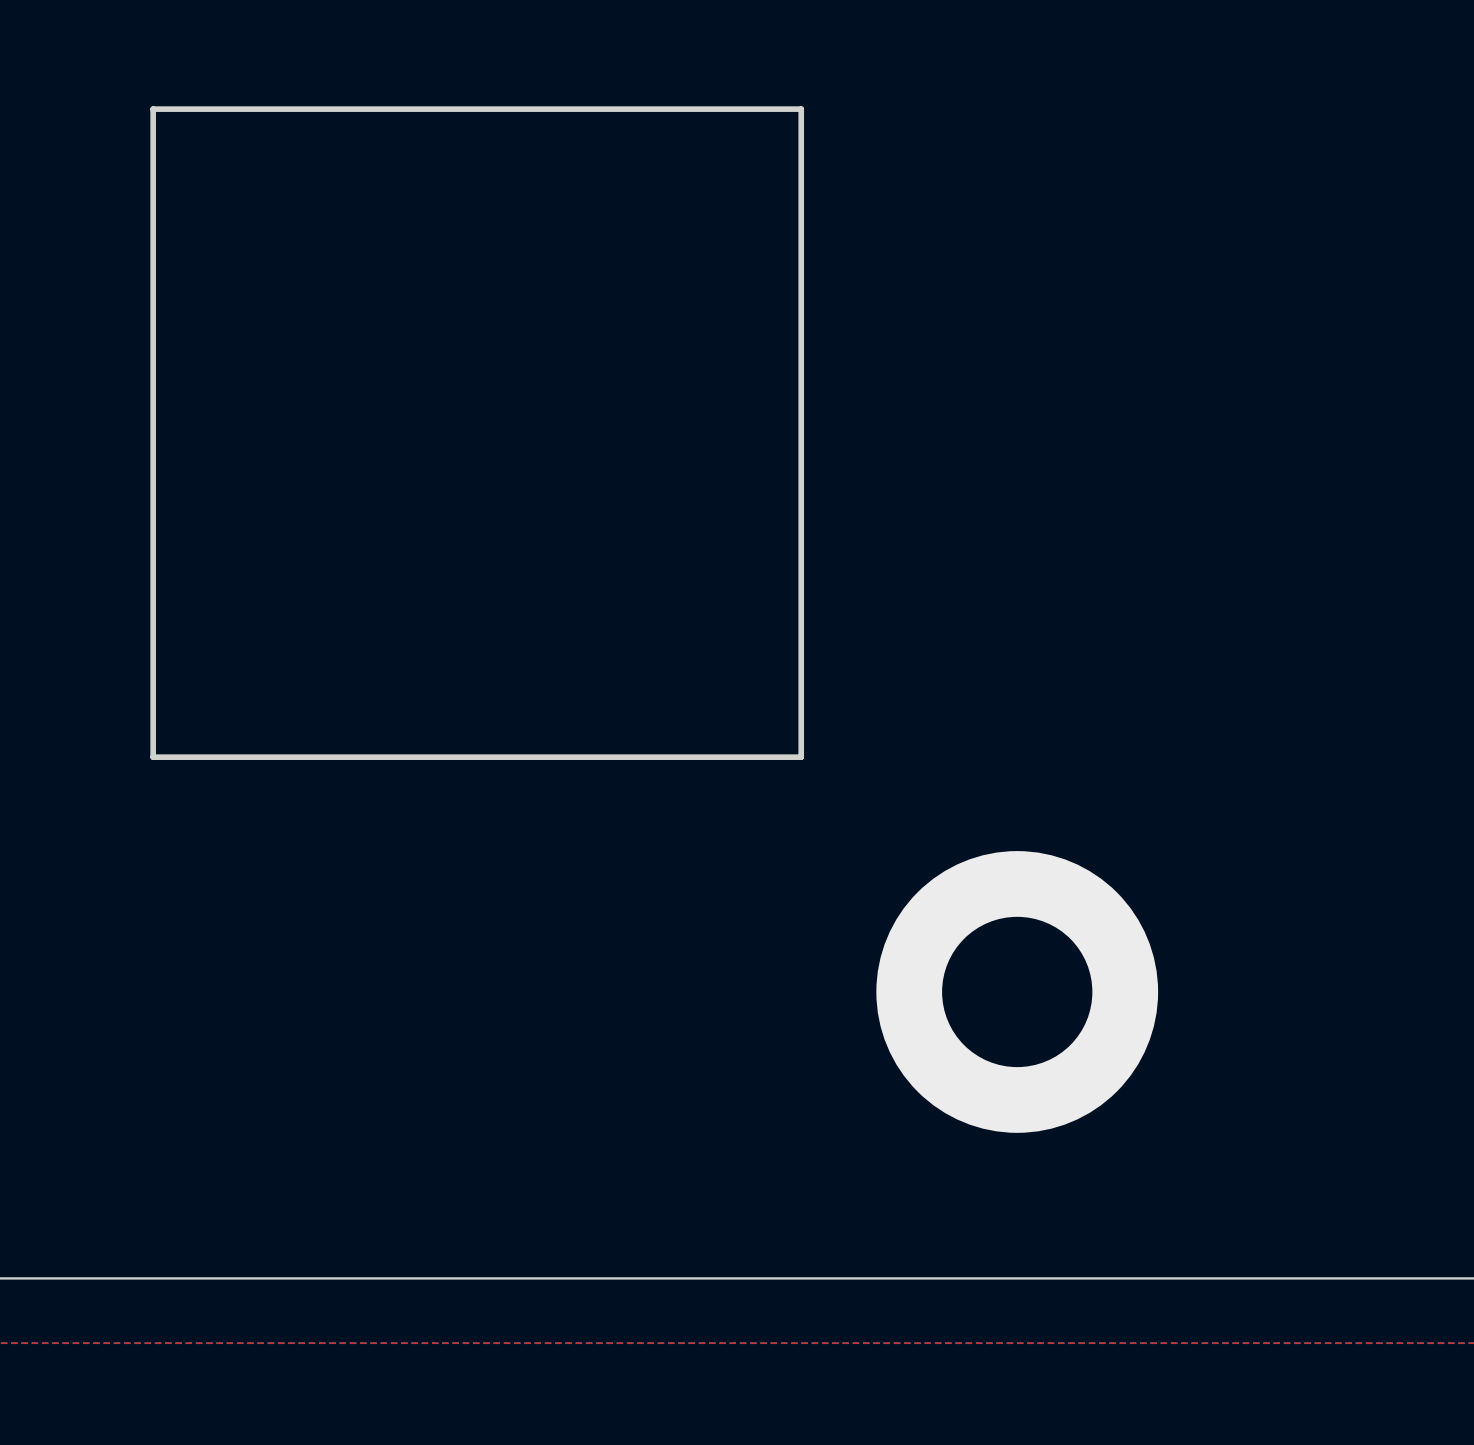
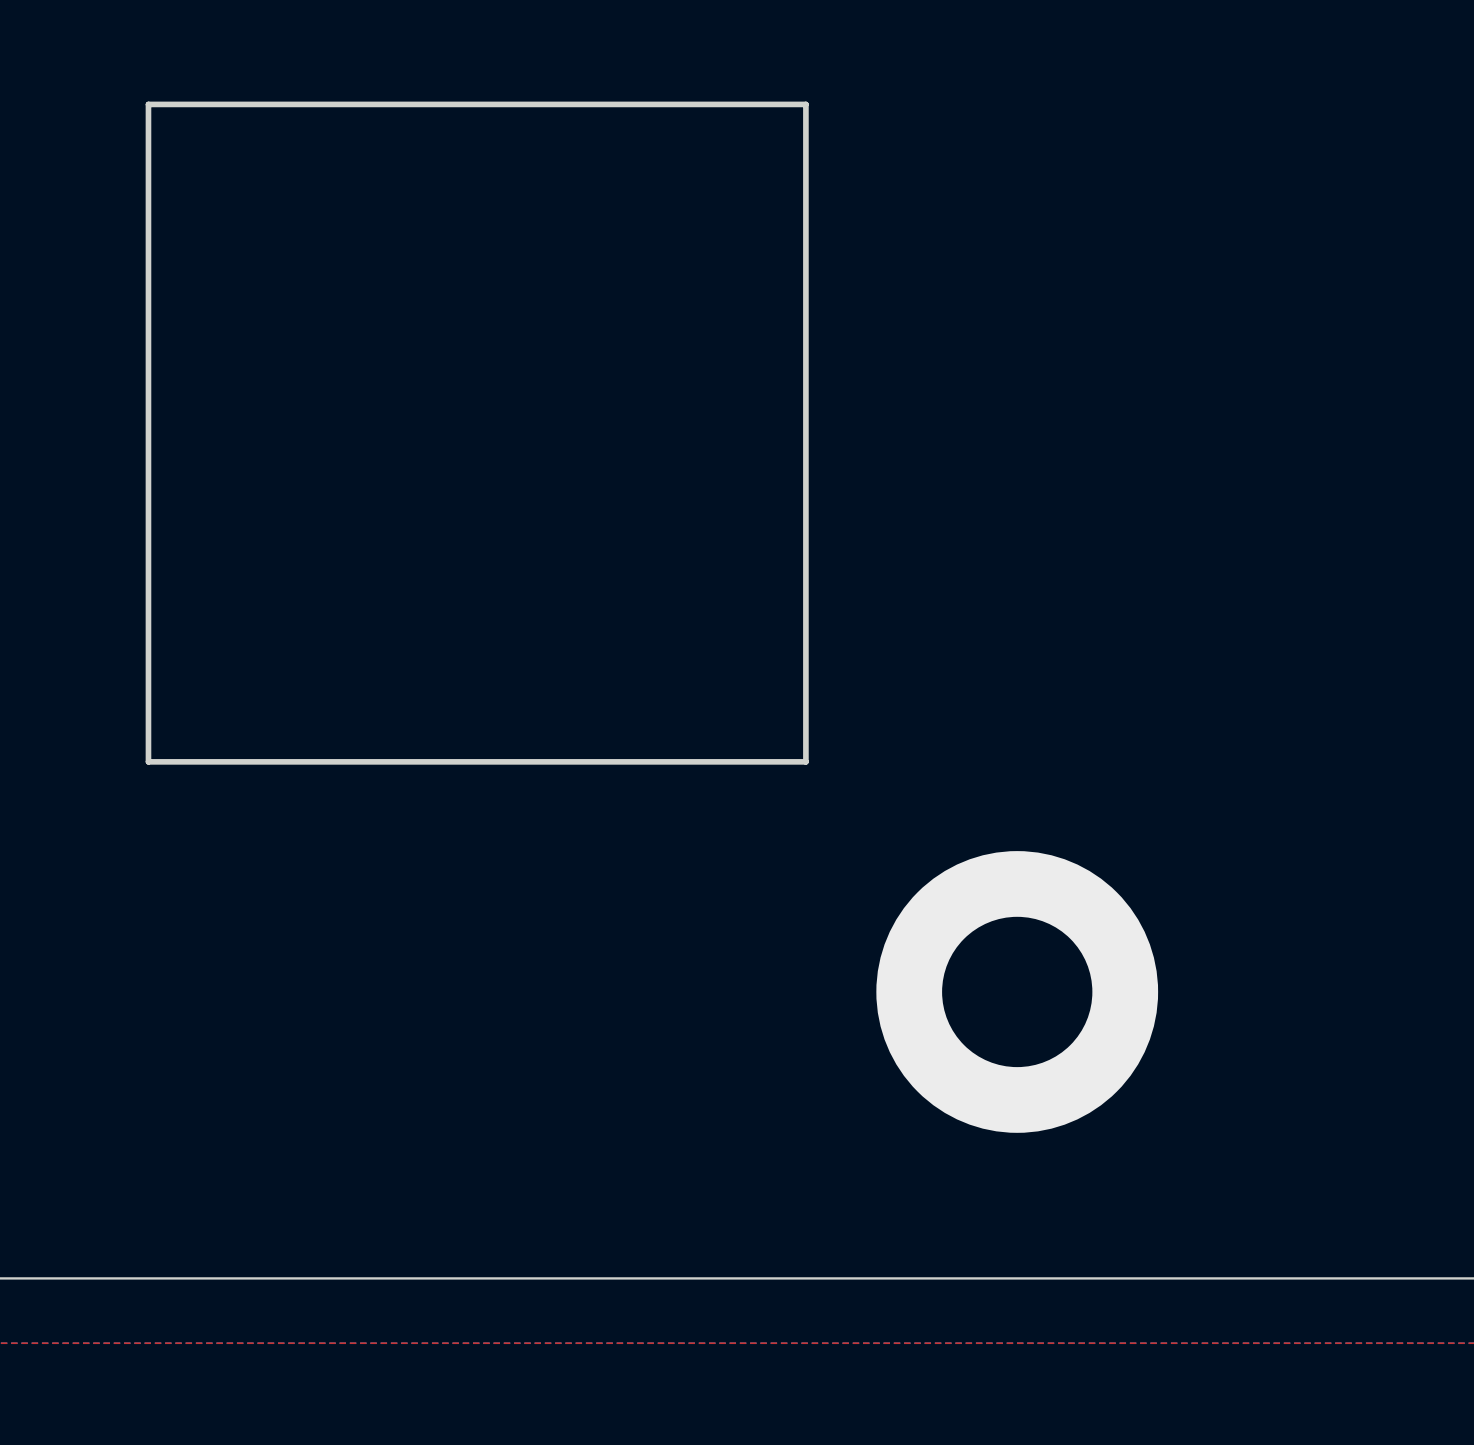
drawing shape: [150, 106, 805, 760] -> [145, 101, 809, 765]

